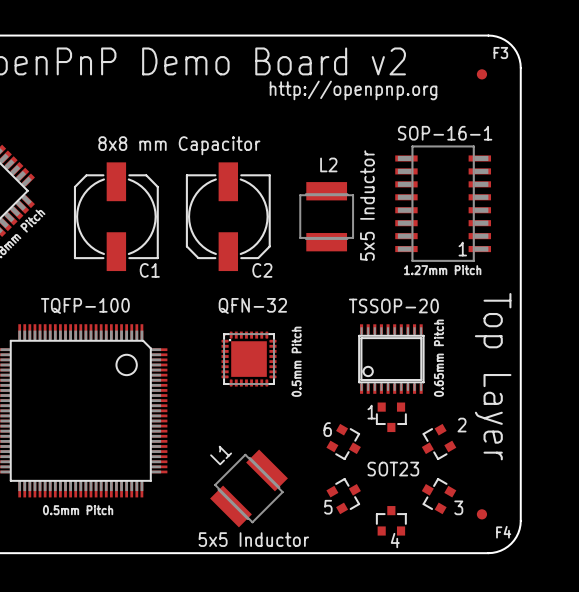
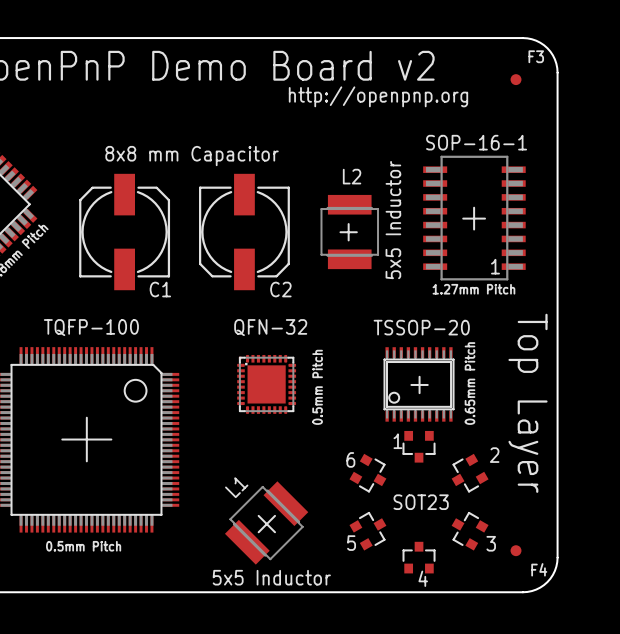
line: none -> (474, 207) (474, 229)
line: none -> (463, 218) (485, 218)
line: none -> (348, 224) (348, 240)
line: none -> (340, 232) (356, 232)
line: none -> (419, 376) (419, 393)
line: none -> (411, 384) (427, 384)
line: none -> (86, 417) (86, 461)
line: none -> (62, 439) (111, 439)
line: none -> (258, 515) (275, 532)
line: none -> (275, 515) (258, 532)

